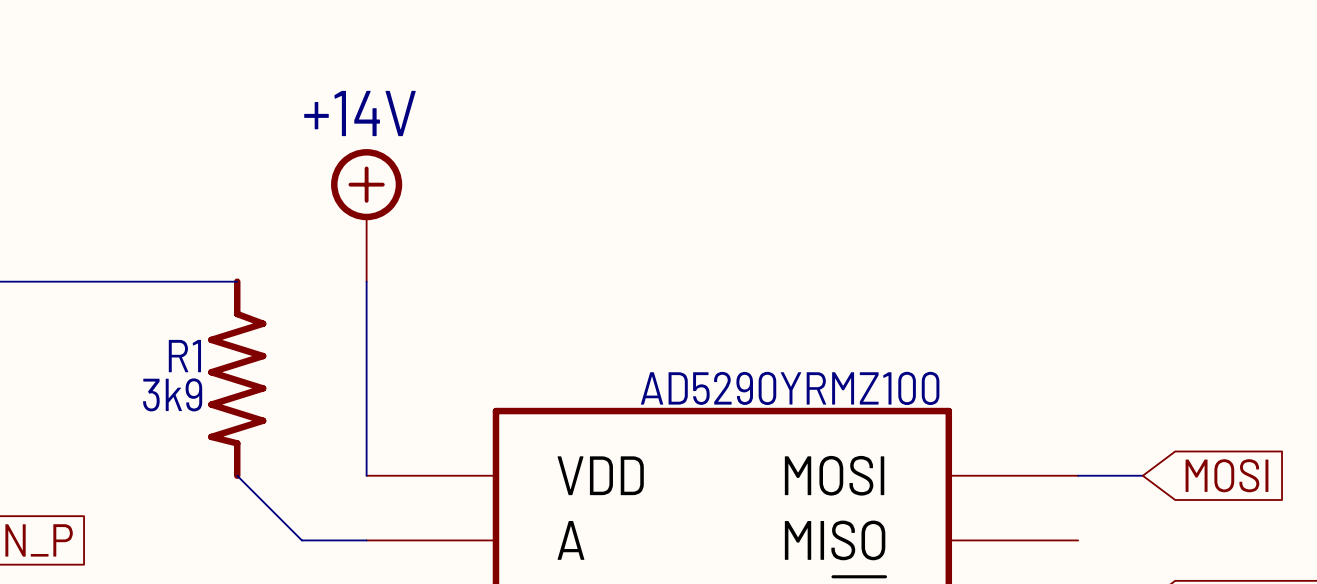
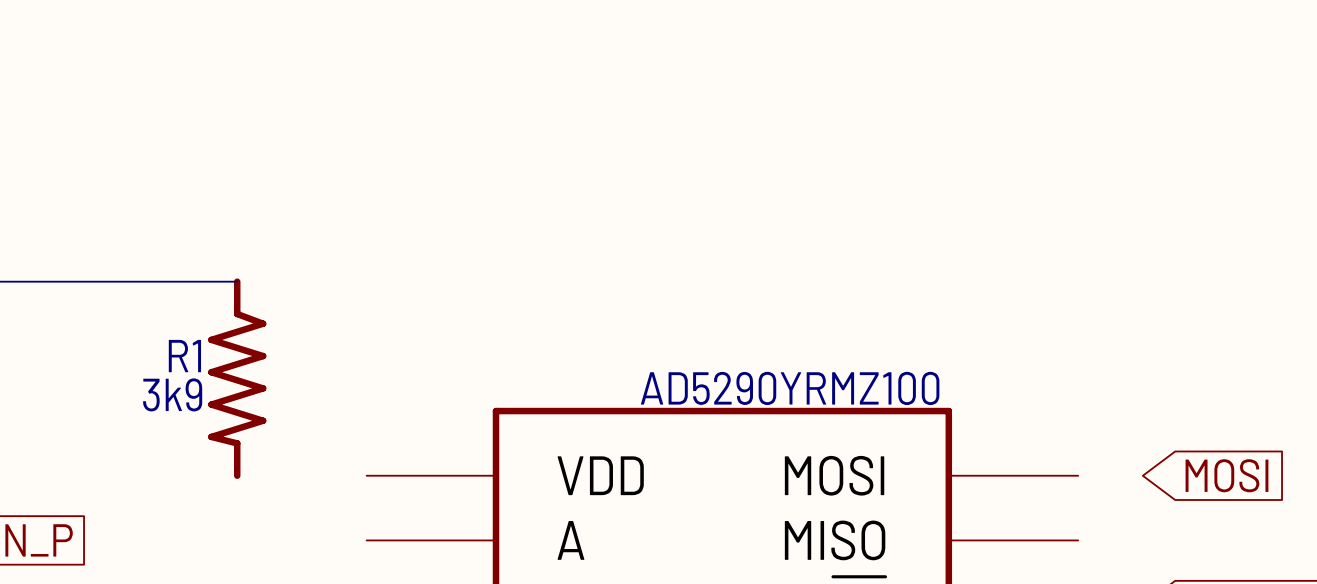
power symbol: +14V (366, 215) -> none
wire: (366, 281) (366, 475) -> none
wire: (237, 475) (301, 540) (366, 540) -> none
wire: (1078, 475) (1142, 475) -> none

